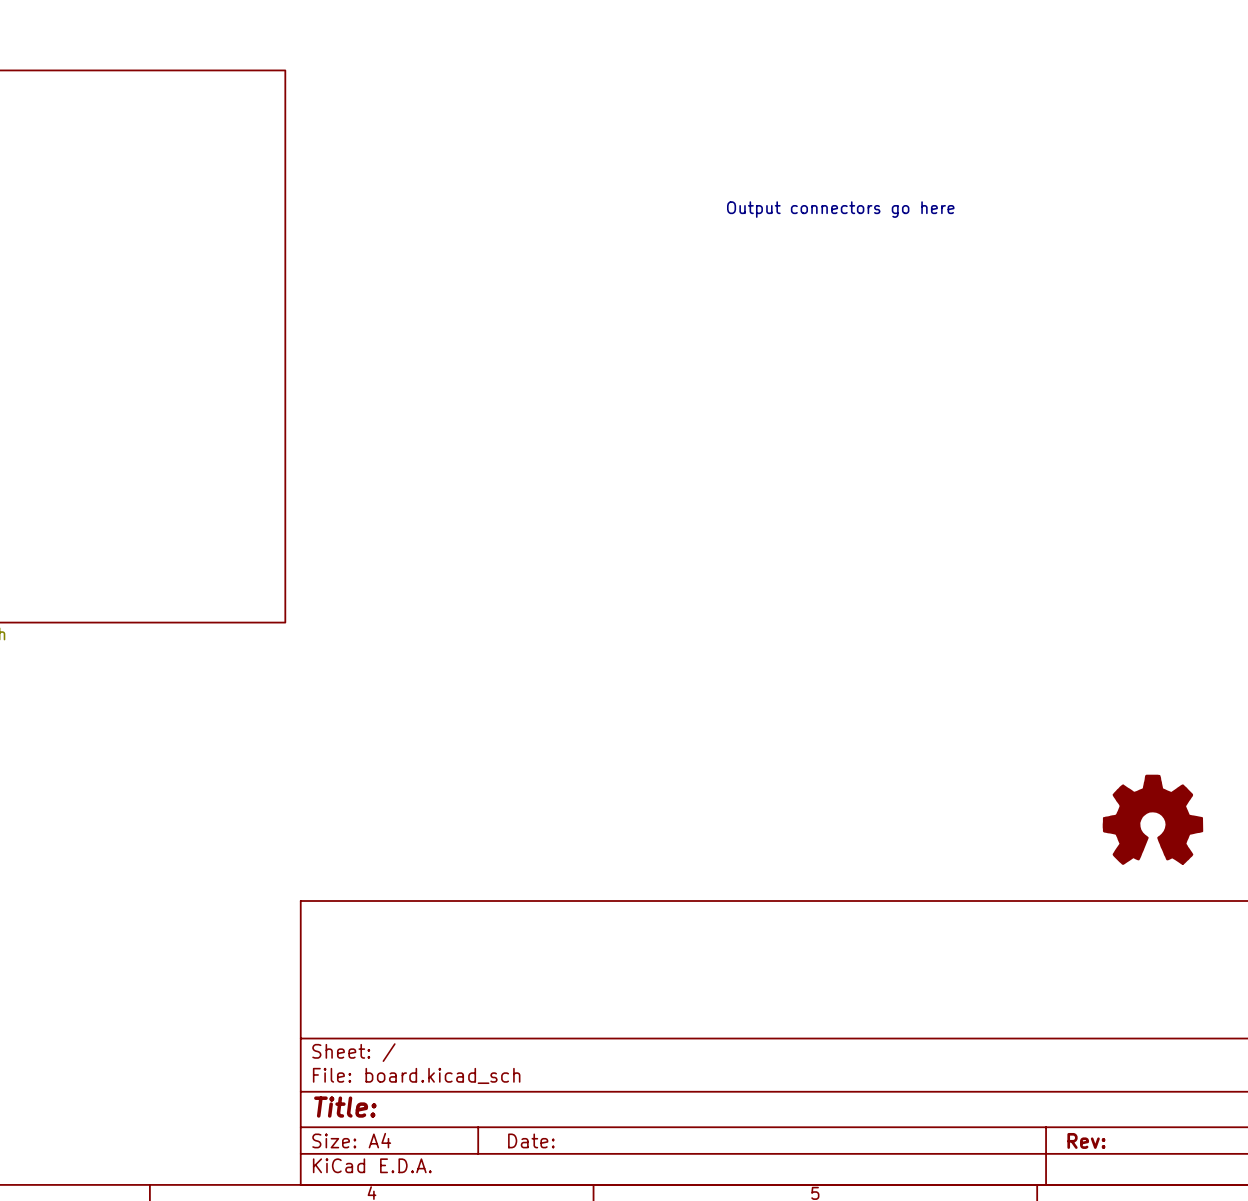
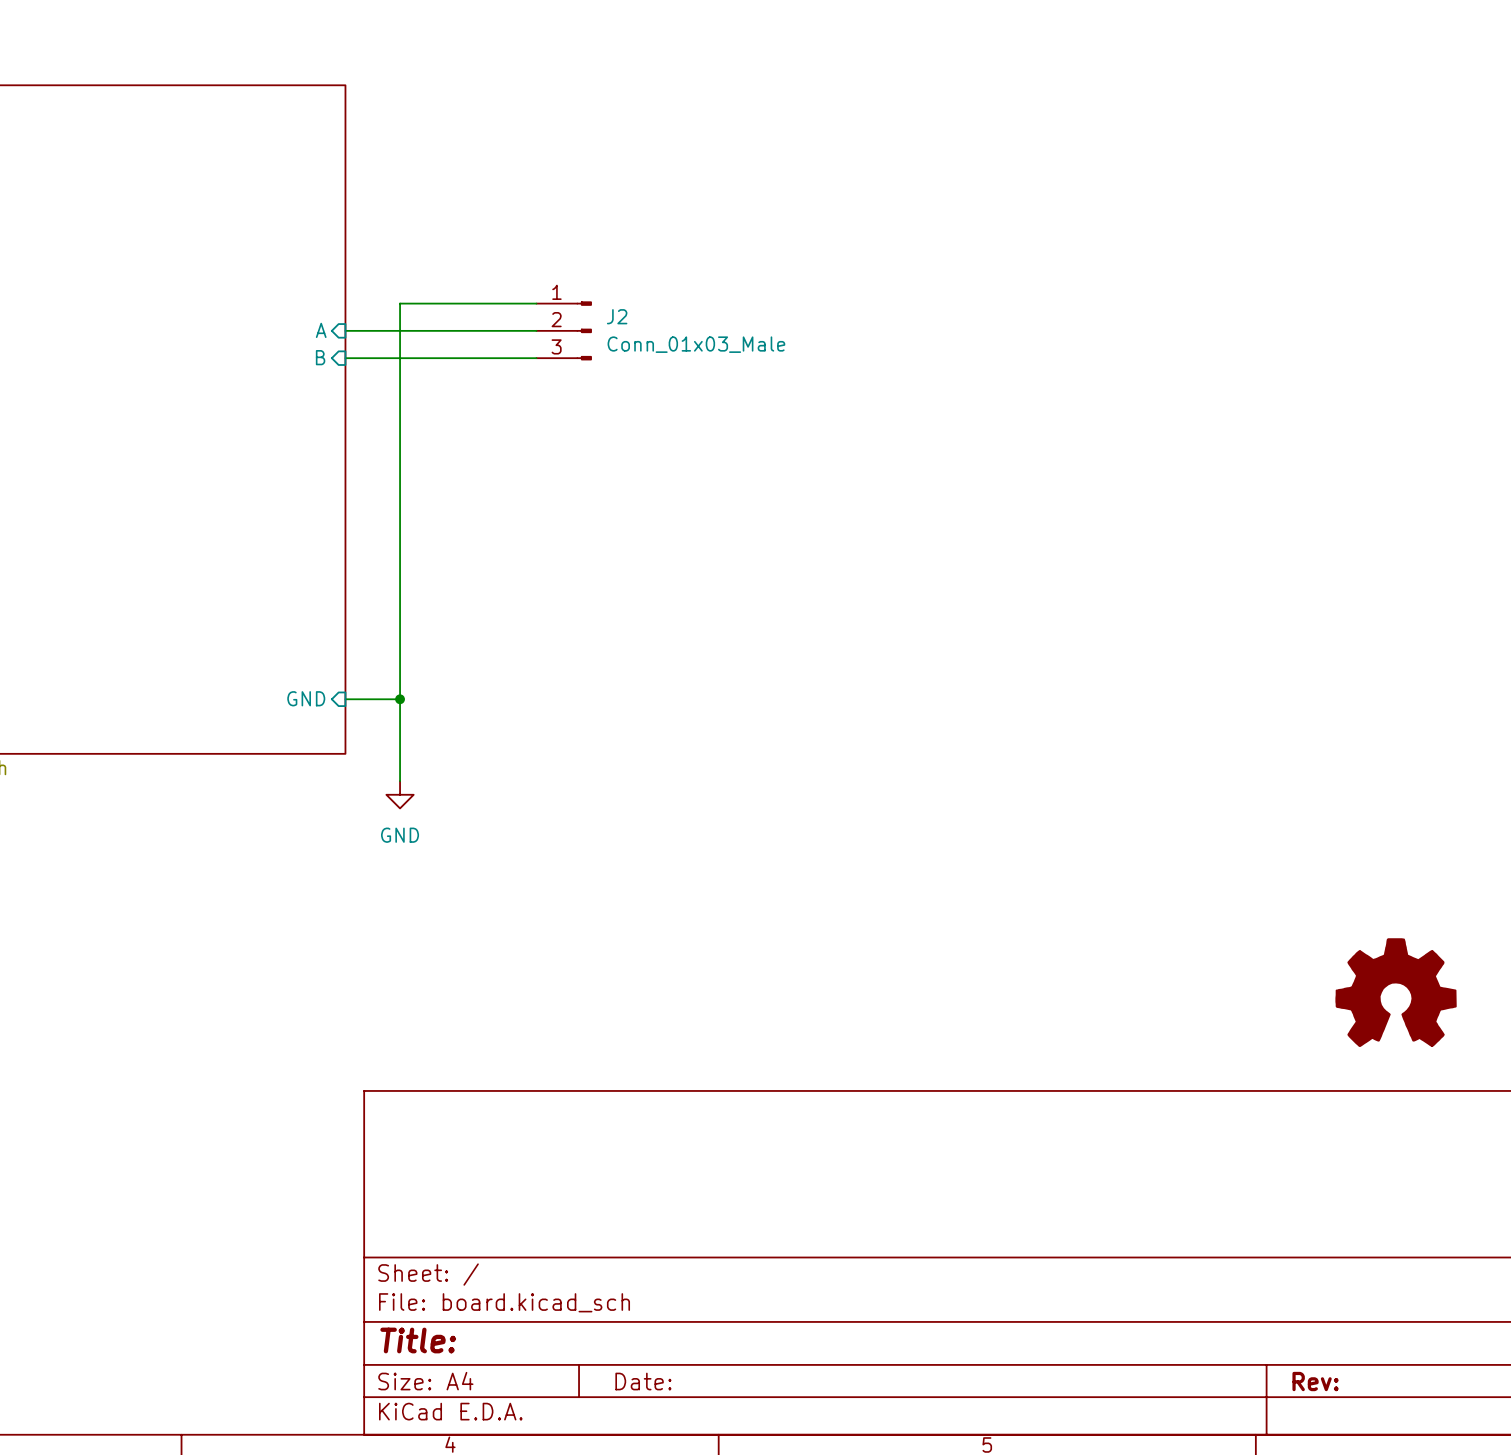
text: Output connectors go here (840, 209) -> none
wire: none -> (536, 303) (400, 303) (400, 781)
sheet pin: none -> A (321, 330)
wire: none -> (345, 330) (536, 330)
J2: none -> Conn_01x03_Male (564, 330)
sheet pin: none -> B (320, 357)
wire: none -> (345, 358) (536, 358)
sheet pin: none -> GND (306, 698)
wire: none -> (345, 699) (400, 699)
junction: none -> (400, 699)
power symbol: none -> GND (400, 794)

